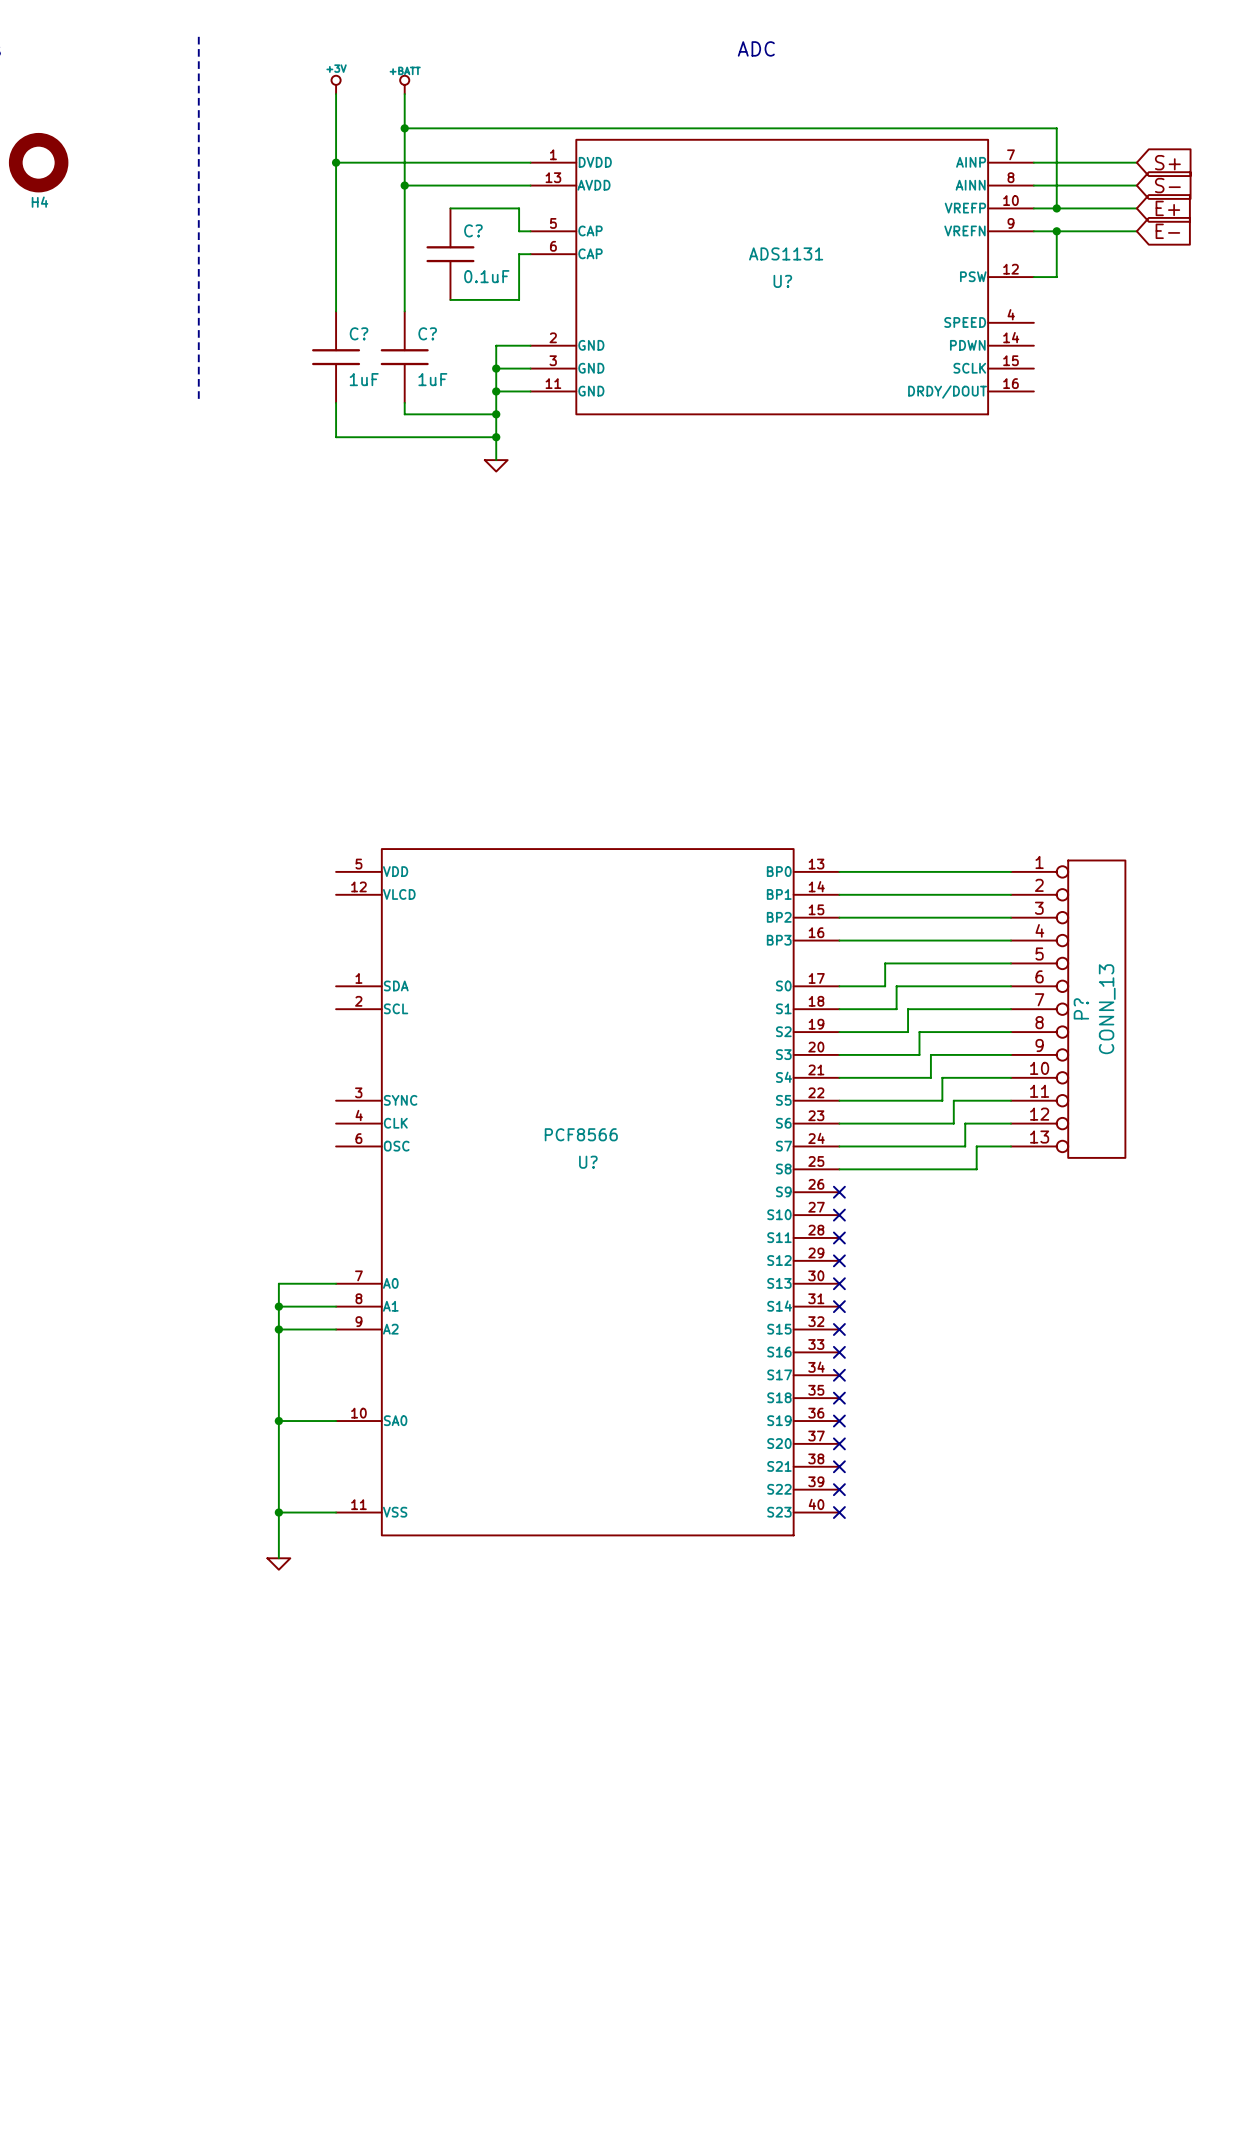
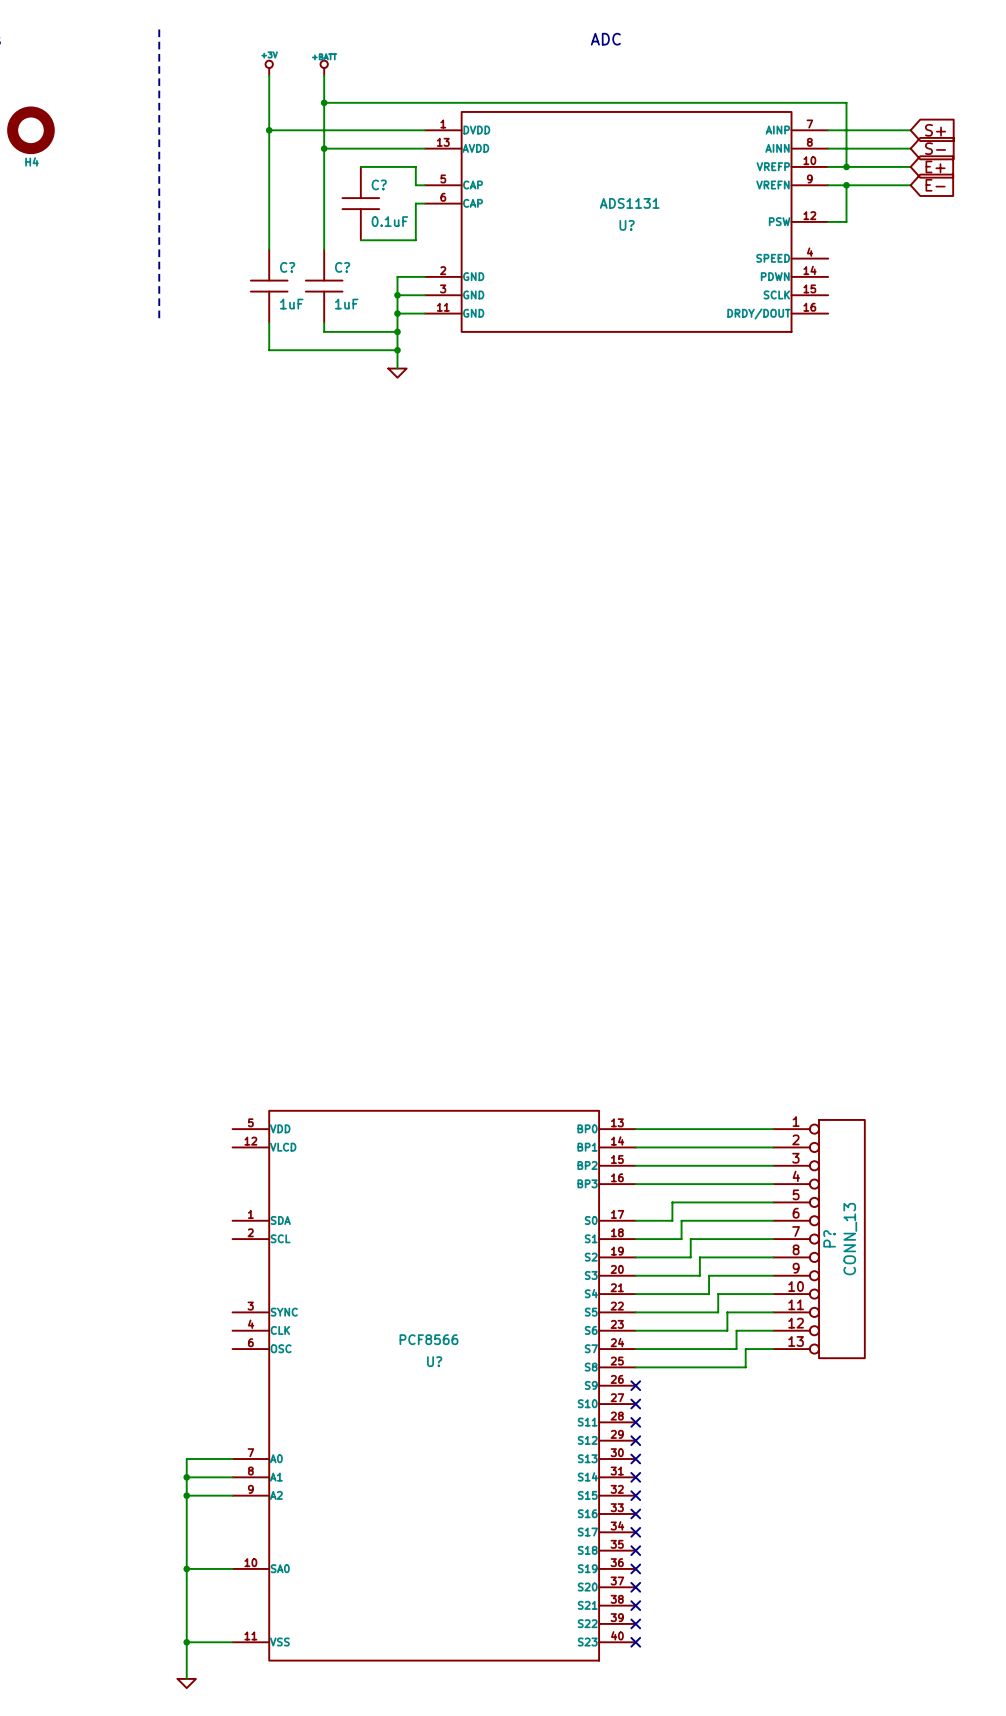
wire: (839, 871) (1011, 871) -> none
wire: (839, 894) (1011, 894) -> none
wire: (839, 917) (1011, 917) -> none
wire: (839, 940) (1011, 940) -> none
wire: (1011, 963) (885, 963) (885, 986) (839, 986) -> none
wire: (1011, 986) (896, 986) (896, 1009) (839, 1009) -> none
wire: (1011, 1009) (908, 1009) (908, 1032) (839, 1032) -> none
P?: CONN_13 (1068, 1009) -> none
wire: (1011, 1032) (919, 1032) (919, 1054) (839, 1054) -> none
wire: (1011, 1054) (930, 1054) (930, 1077) (839, 1077) -> none
wire: (1011, 1077) (942, 1077) (942, 1100) (839, 1100) -> none
wire: (1011, 1100) (953, 1100) (953, 1123) (839, 1123) -> none
wire: (1011, 1123) (965, 1123) (965, 1146) (839, 1146) -> none
wire: (1011, 1146) (976, 1146) (976, 1169) (839, 1169) -> none
U?: PCF8566 (587, 1192) -> none
no-connect mark: (839, 1192) -> none
no-connect mark: (839, 1215) -> none
no-connect mark: (839, 1237) -> none
no-connect mark: (839, 1260) -> none
wire: (336, 1283) (278, 1283) (278, 1558) -> none
no-connect mark: (839, 1283) -> none
wire: (278, 1306) (336, 1306) -> none
junction: (278, 1306) -> none
no-connect mark: (839, 1306) -> none
wire: (278, 1329) (336, 1329) -> none
junction: (278, 1329) -> none
no-connect mark: (839, 1329) -> none
no-connect mark: (839, 1352) -> none
no-connect mark: (839, 1375) -> none
no-connect mark: (839, 1398) -> none
wire: none -> (635, 1129) (773, 1129)
wire: (278, 1421) (336, 1421) -> none
junction: (278, 1421) -> none
no-connect mark: (839, 1421) -> none
wire: none -> (635, 1147) (773, 1147)
no-connect mark: (839, 1443) -> none
wire: none -> (635, 1165) (773, 1165)
no-connect mark: (839, 1466) -> none
wire: none -> (635, 1184) (773, 1184)
no-connect mark: (839, 1489) -> none
wire: none -> (773, 1202) (672, 1202) (672, 1220) (635, 1220)
wire: (278, 1512) (336, 1512) -> none
junction: (278, 1512) -> none
no-connect mark: (839, 1512) -> none
wire: none -> (773, 1220) (681, 1220) (681, 1239) (635, 1239)
wire: none -> (773, 1239) (690, 1239) (690, 1257) (635, 1257)
P?: none -> CONN_13 (819, 1239)
power symbol: (278, 1564) -> none
wire: none -> (773, 1257) (699, 1257) (699, 1275) (635, 1275)
wire: none -> (773, 1275) (709, 1275) (709, 1294) (635, 1294)
wire: none -> (773, 1294) (718, 1294) (718, 1312) (635, 1312)
wire: none -> (773, 1312) (727, 1312) (727, 1330) (635, 1330)
wire: none -> (773, 1330) (736, 1330) (736, 1349) (635, 1349)
wire: none -> (773, 1349) (745, 1349) (745, 1367) (635, 1367)
U?: none -> PCF8566 (434, 1385)
no-connect mark: none -> (635, 1385)
no-connect mark: none -> (635, 1404)
no-connect mark: none -> (635, 1422)
no-connect mark: none -> (635, 1440)
wire: none -> (232, 1459) (186, 1459) (186, 1678)
no-connect mark: none -> (635, 1459)
wire: none -> (186, 1477) (232, 1477)
junction: none -> (186, 1477)
no-connect mark: none -> (635, 1477)
wire: none -> (186, 1495) (232, 1495)
junction: none -> (186, 1495)
no-connect mark: none -> (635, 1495)
no-connect mark: none -> (635, 1513)
no-connect mark: none -> (635, 1532)
no-connect mark: none -> (635, 1550)
wire: none -> (186, 1568) (232, 1568)
junction: none -> (186, 1568)
no-connect mark: none -> (635, 1568)
no-connect mark: none -> (635, 1587)
no-connect mark: none -> (635, 1605)
no-connect mark: none -> (635, 1623)
wire: none -> (186, 1642) (232, 1642)
junction: none -> (186, 1642)
no-connect mark: none -> (635, 1642)
power symbol: none -> (186, 1683)

